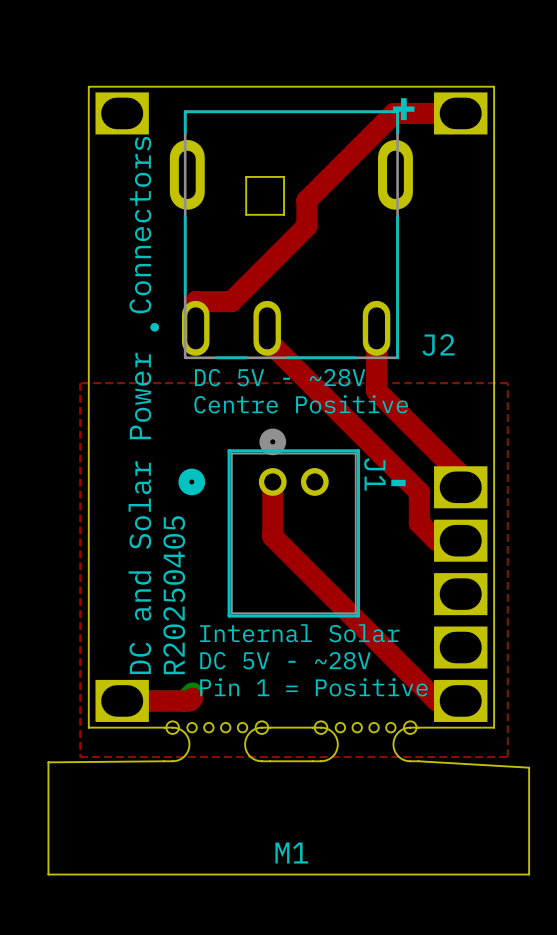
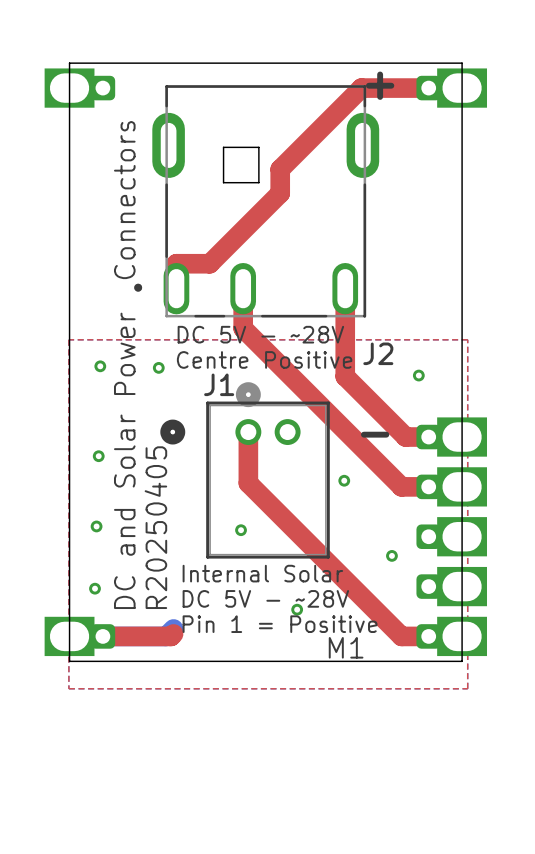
M1 footprint: [88, 86, 495, 762] -> [44, 62, 488, 662]
top track: (267, 340) (419, 492) (419, 523) -> (243, 299) (243, 328) (385, 470)
J2 name position: J2 (438, 344) -> J2 (378, 353)
top track: (376, 390) (460, 474) (460, 487) -> (345, 346) (345, 376) (405, 437) (423, 437)
via: none -> (100, 366)
via: none -> (158, 367)
via: none -> (418, 375)
J1 name rotation: 0° (374, 474) -> 90° counterclockwise (219, 384)
J1 name position: J1 (374, 474) -> J1 (219, 384)
via: none -> (98, 456)
via: none -> (344, 480)
via: none -> (96, 526)
via: none -> (241, 530)
via: none -> (391, 555)
via: none -> (95, 588)
via: none -> (297, 609)
board edge: (164, 761) (48, 762) (48, 874) (529, 874) (529, 767) (418, 761) -> none
board edge: (270, 761) (312, 761) -> none
M1 name position: M1 (291, 853) -> M1 (346, 647)

